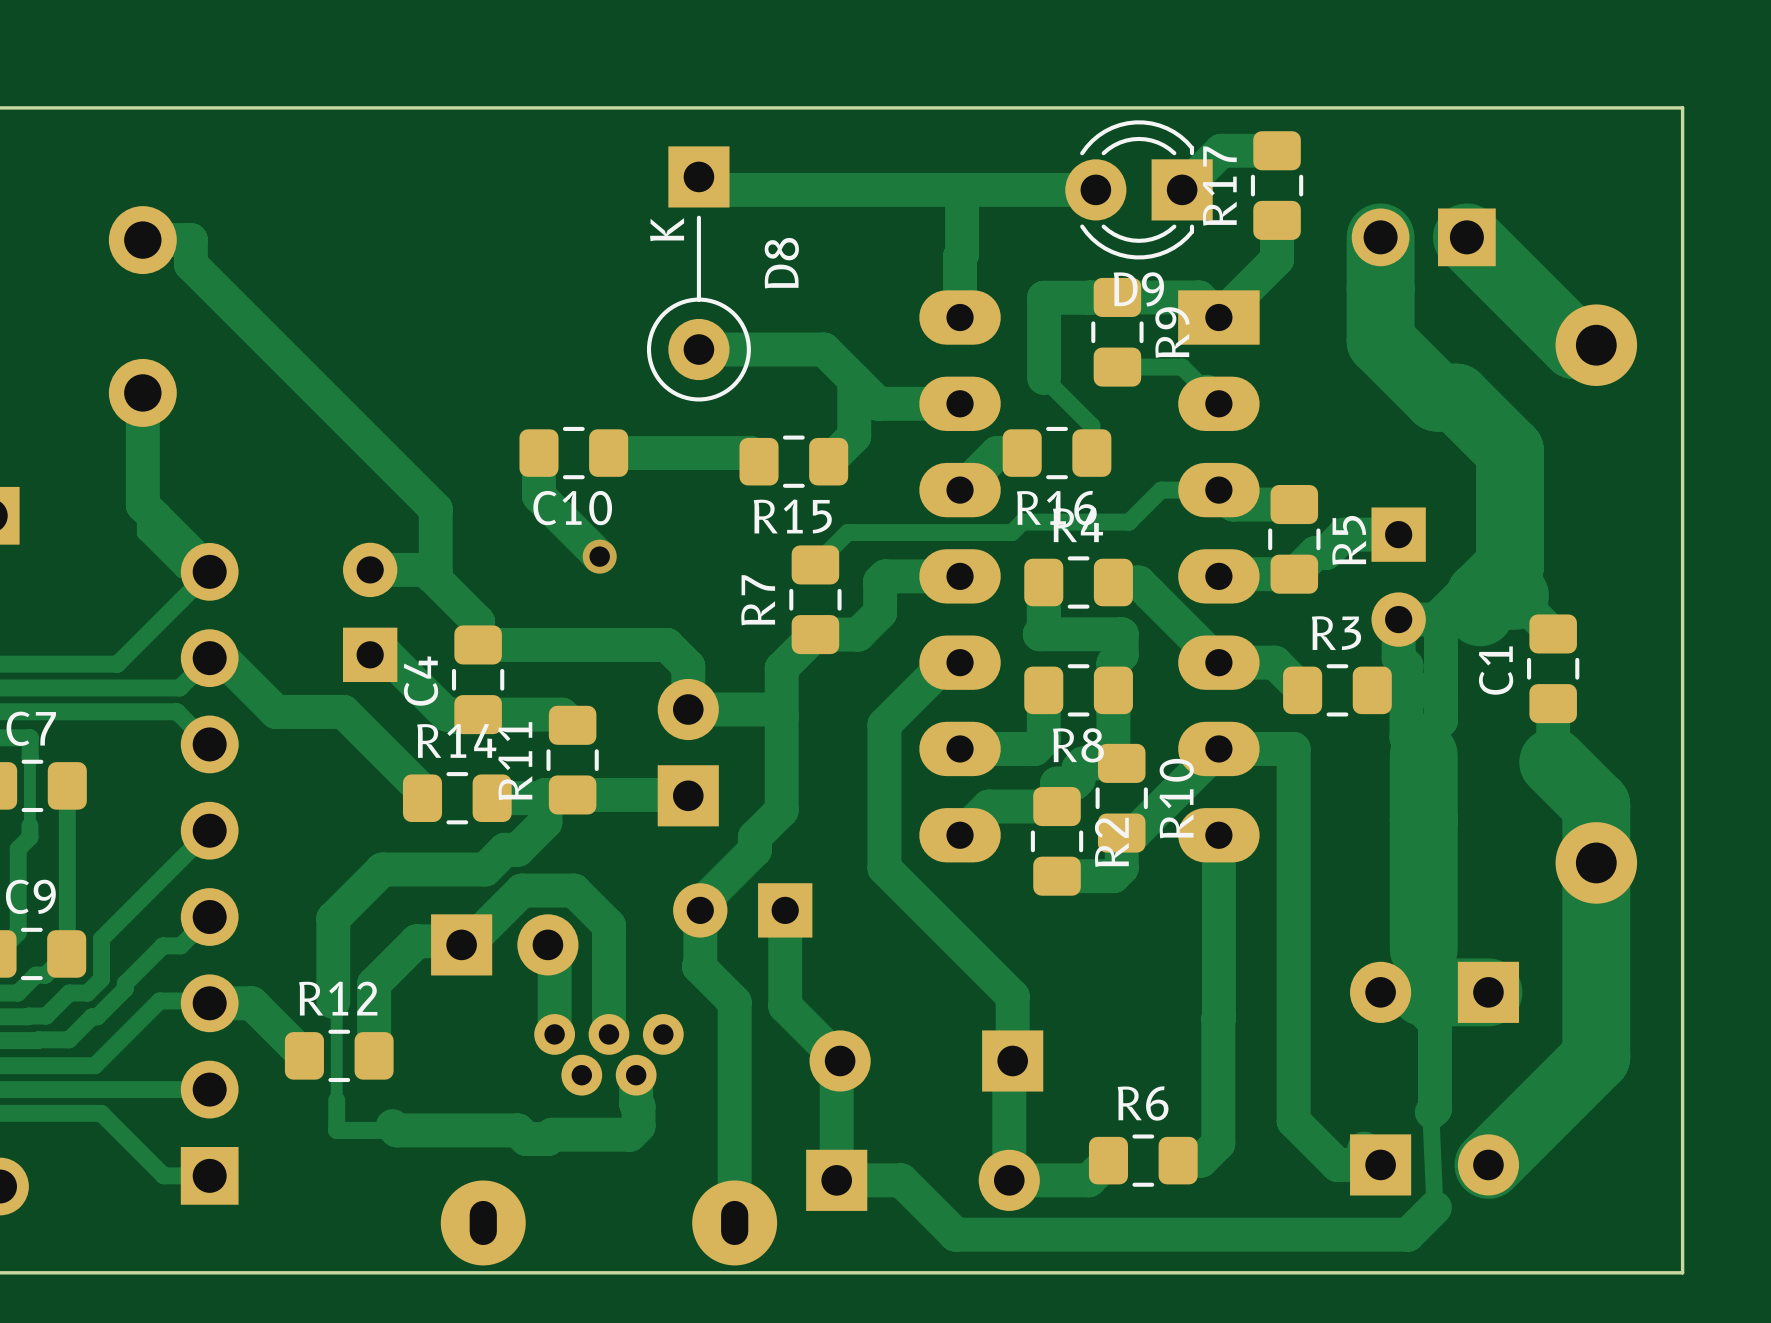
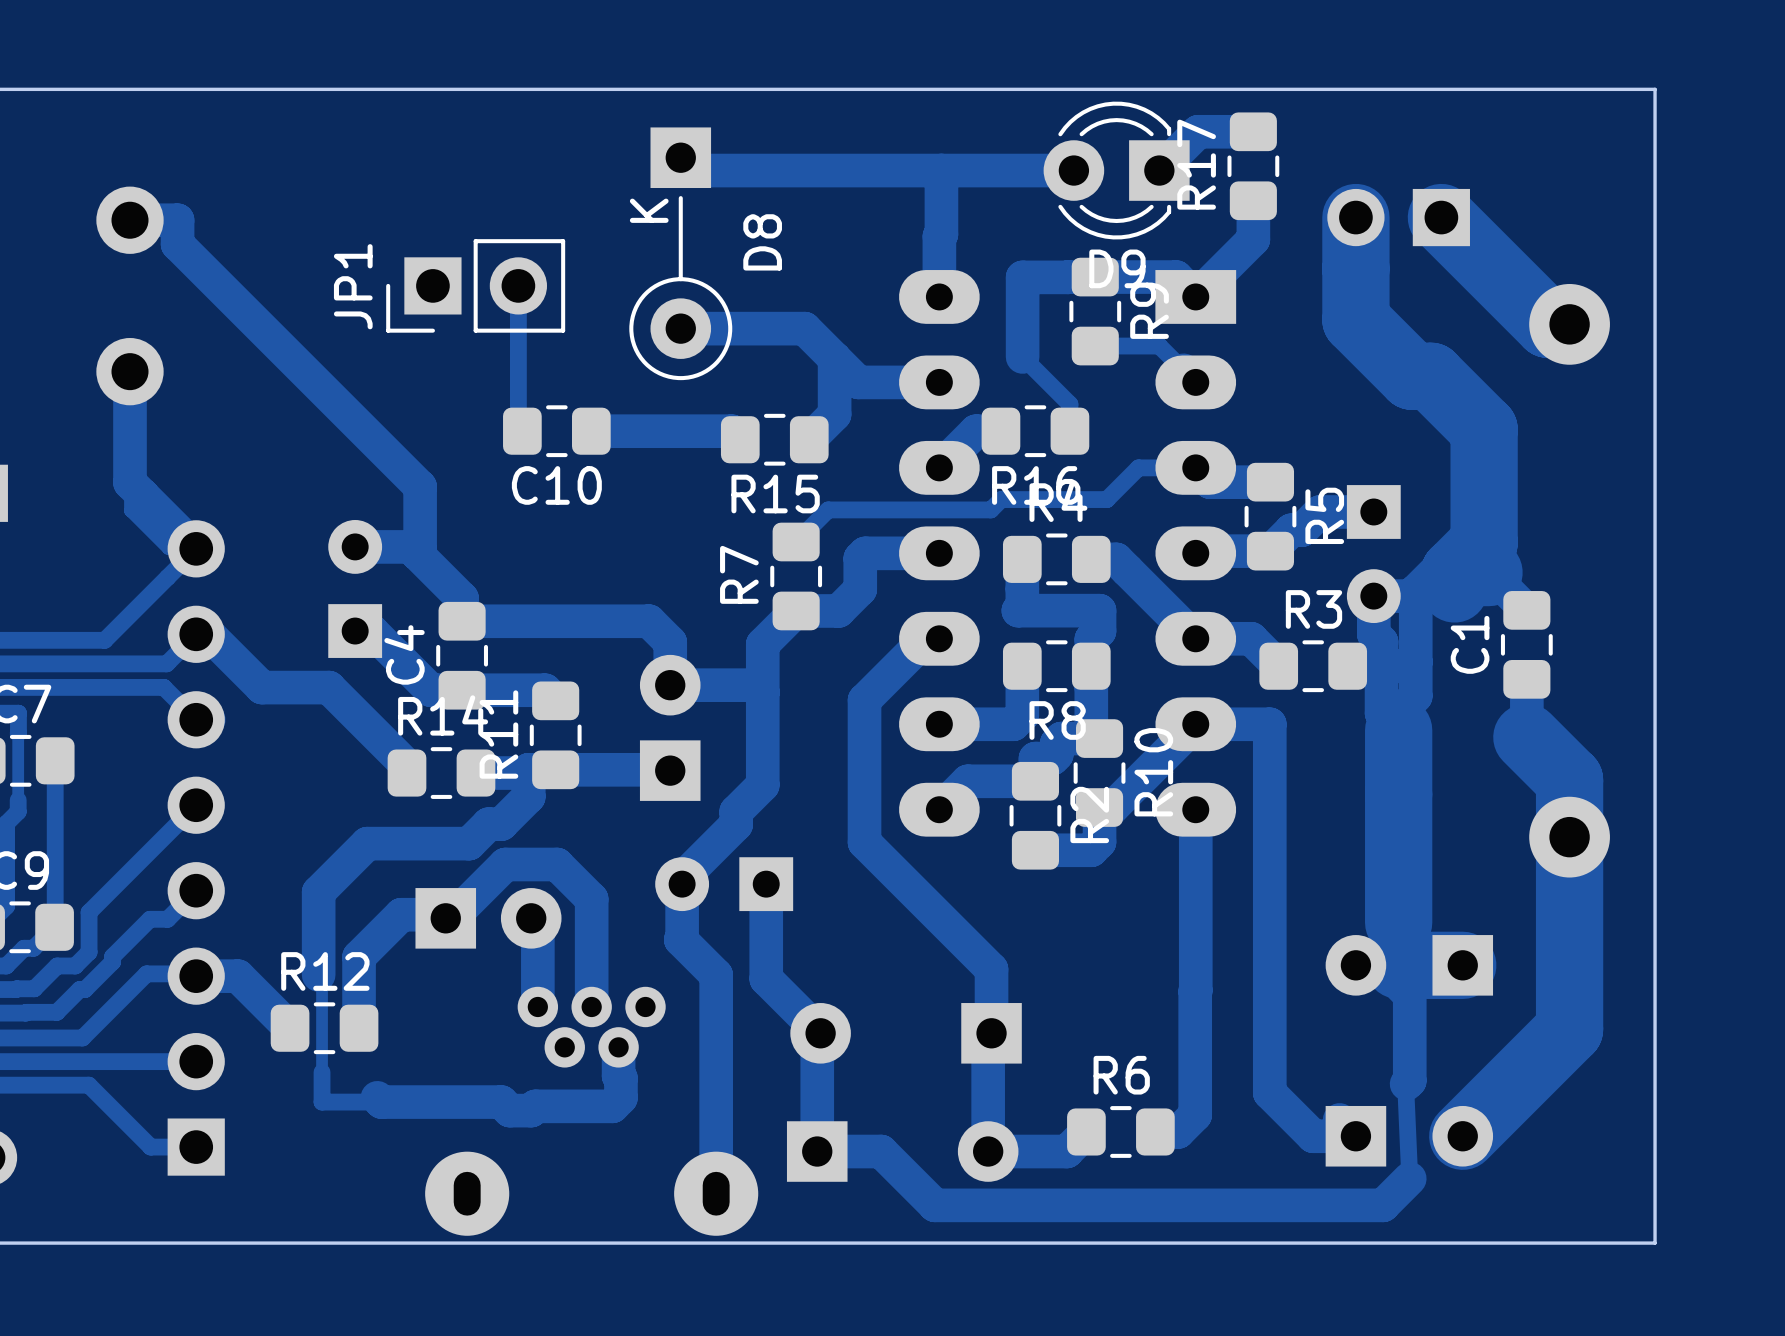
JP1: none -> (475, 285)
track: (538, 453) (538, 495) (599, 556) -> (522, 431) (518, 427) (518, 285)
via: (599, 556) -> none

